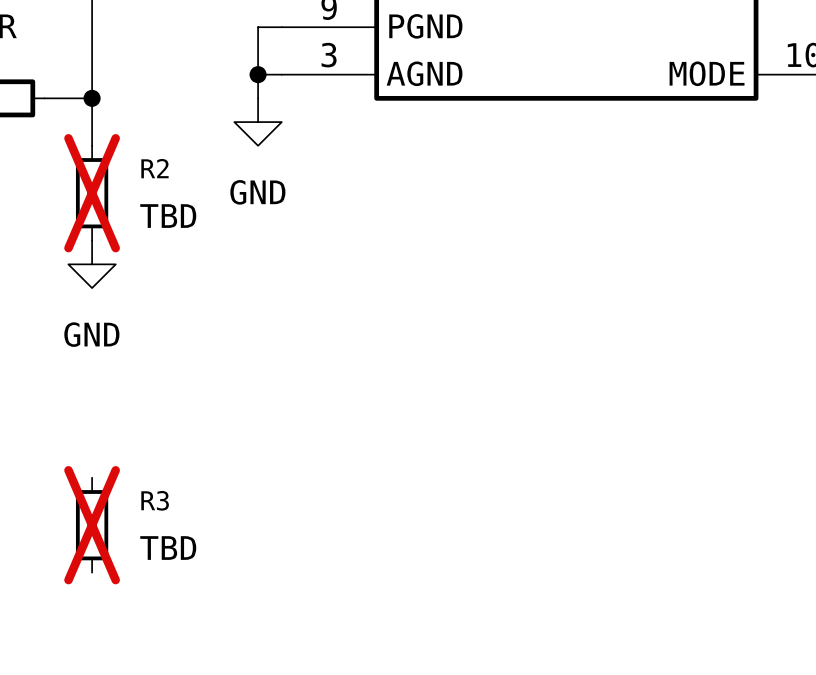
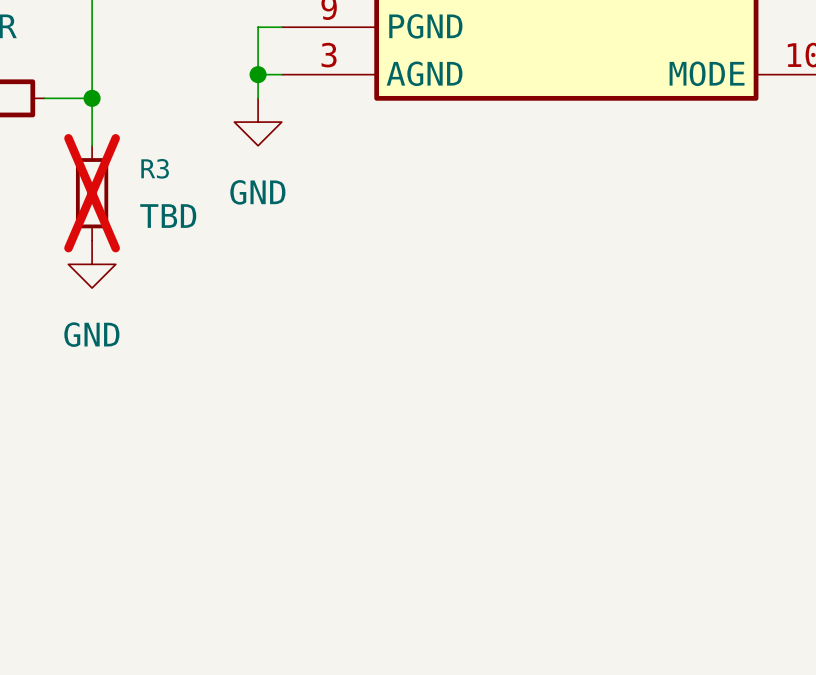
R2 name: R2 (154, 168) -> R3 (155, 168)
R3: TBD (92, 525) -> none

